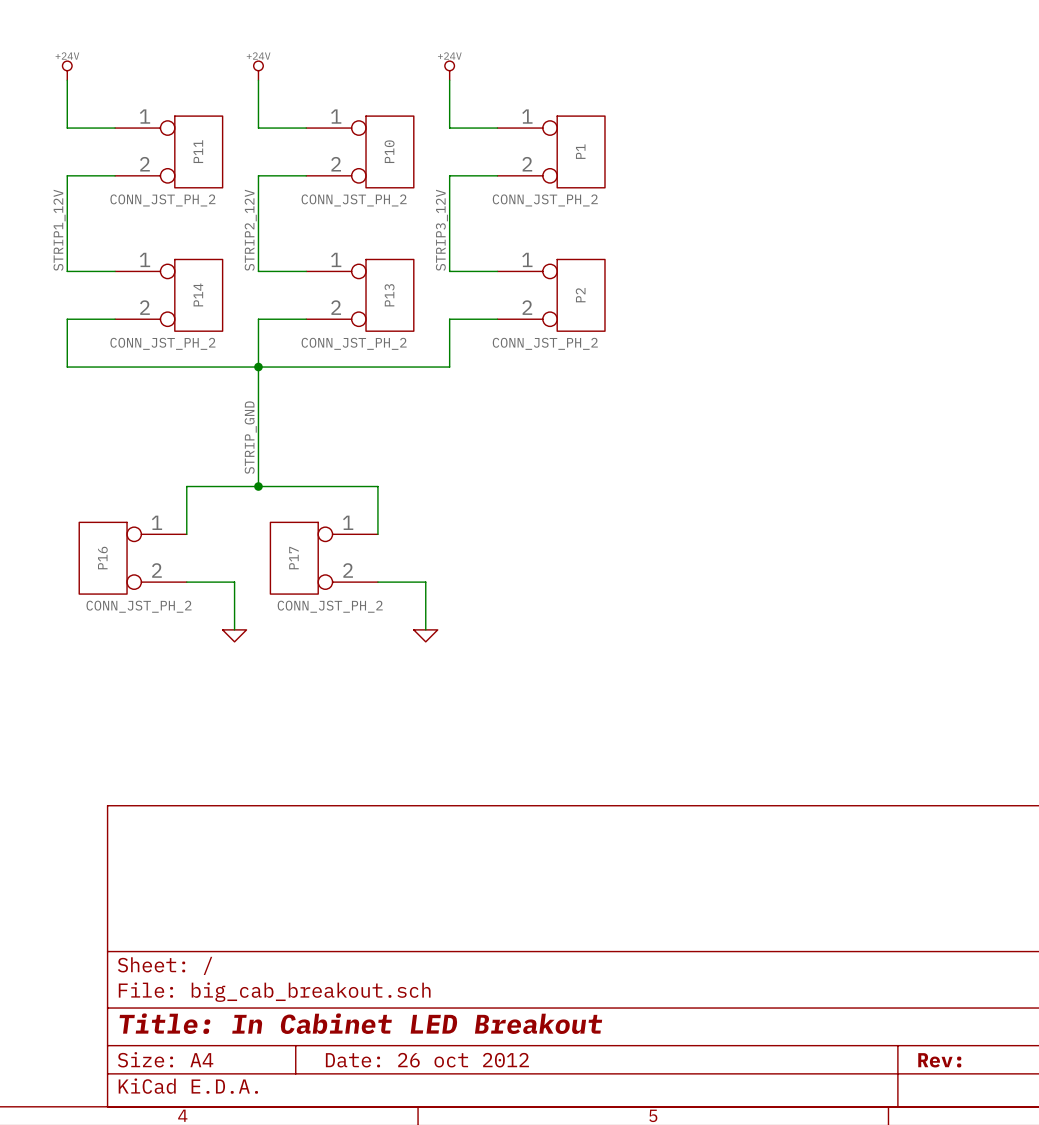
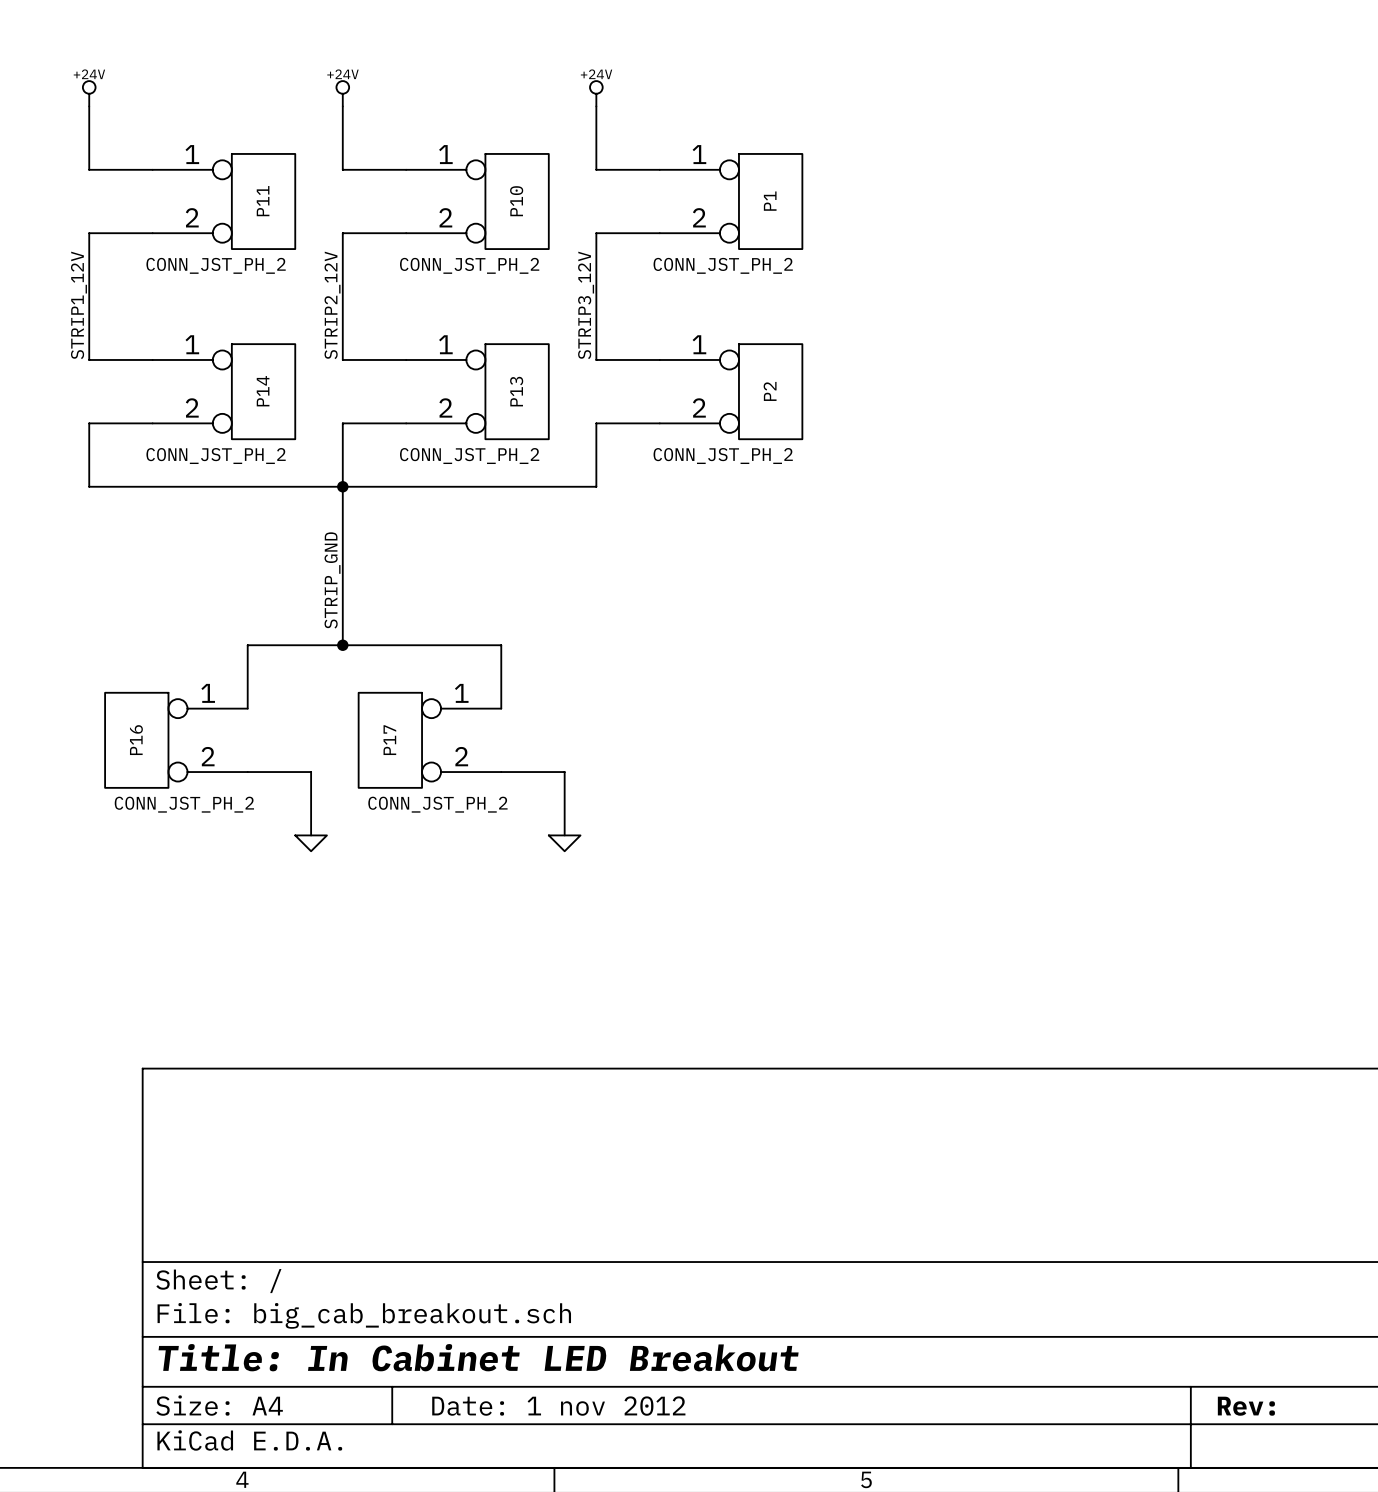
title block: Date: 26 oct 2012 (427, 1060) -> Date: 1 nov 2012 (558, 1406)

